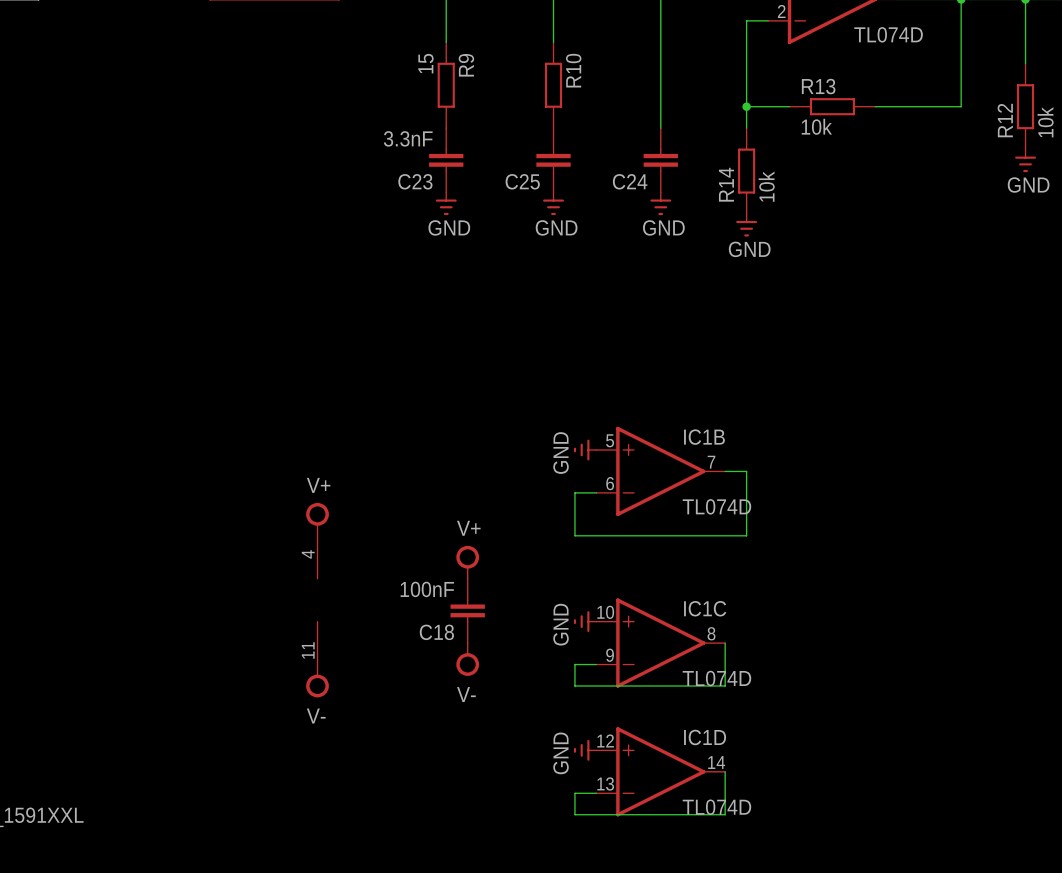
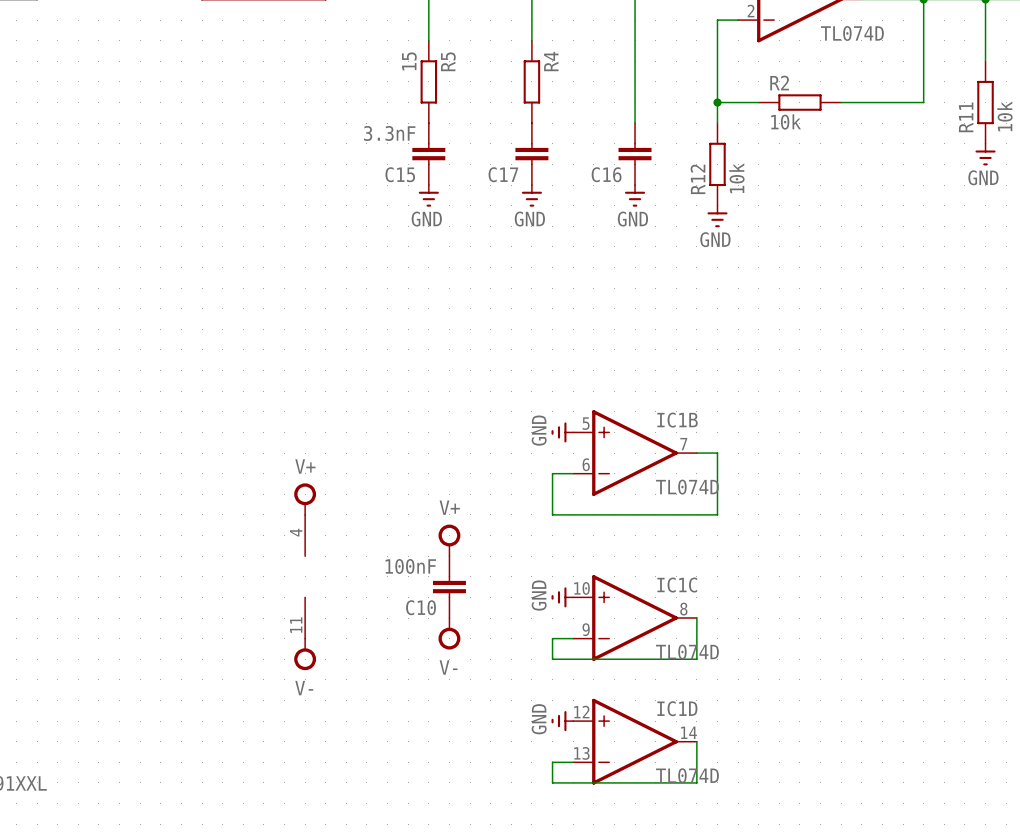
R9 name: R9 (466, 65) -> R5 (448, 61)
R10 name: R10 (573, 70) -> R4 (551, 61)
R13 name: R13 (818, 86) -> R2 (779, 83)
R12 name: R12 (1005, 120) -> R11 (966, 117)
C23 name: C23 (415, 181) -> C15 (400, 174)
C25 name: C25 (522, 181) -> C17 (503, 174)
C24 name: C24 (630, 181) -> C16 (606, 174)
R14 name: R14 (726, 184) -> R12 (697, 179)
C18 name: C18 (436, 632) -> C10 (421, 607)

